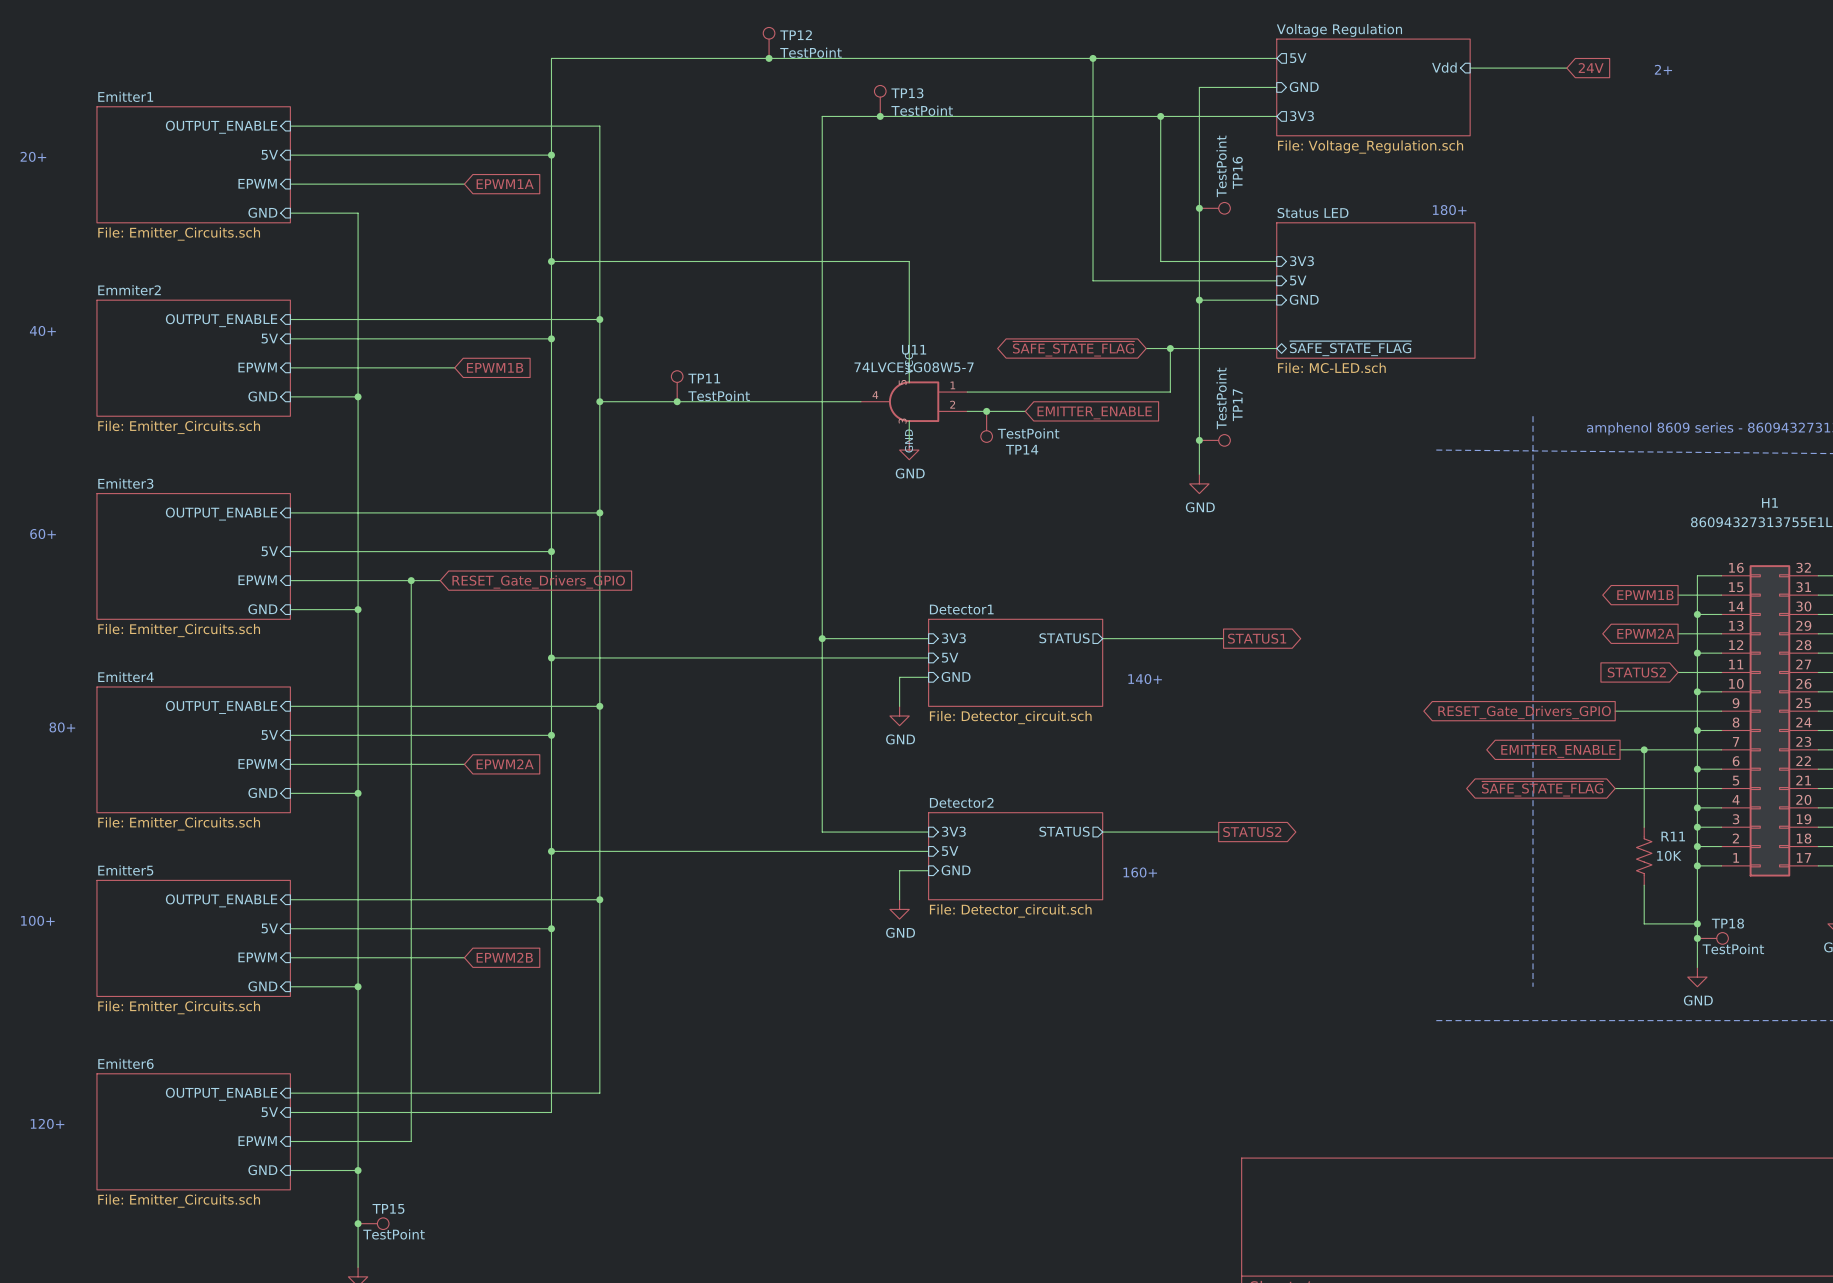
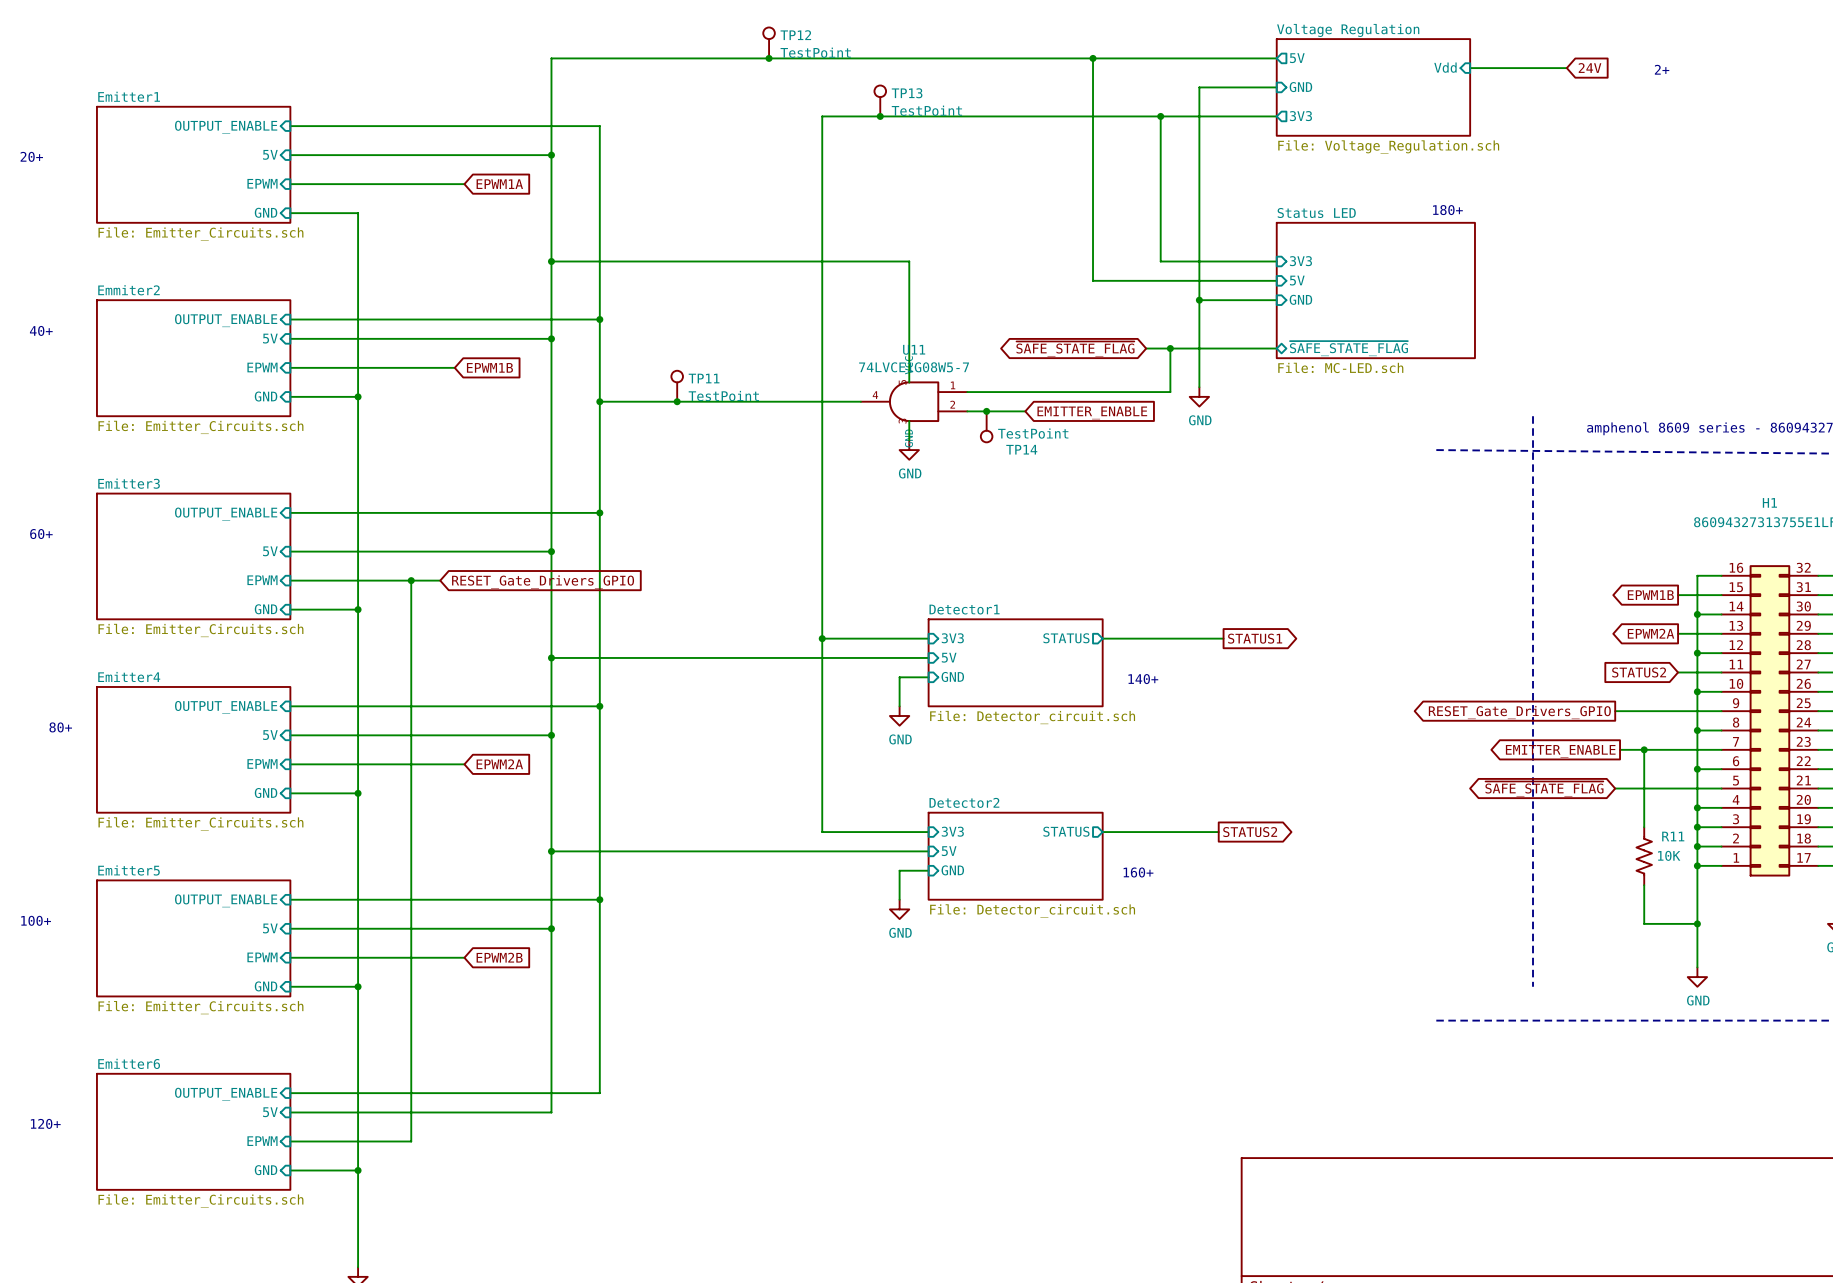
junction: (1199, 208) -> none
TP16: TestPoint (1214, 208) -> none
wire: (1199, 387) (1199, 474) -> none
junction: (1199, 440) -> none
TP17: TestPoint (1214, 440) -> none
power symbol position: GND (1199, 483) -> GND (1199, 396)
junction: (1697, 938) -> none
TP18: TestPoint (1712, 938) -> none
junction: (358, 1223) -> none
TP15: TestPoint (373, 1223) -> none

